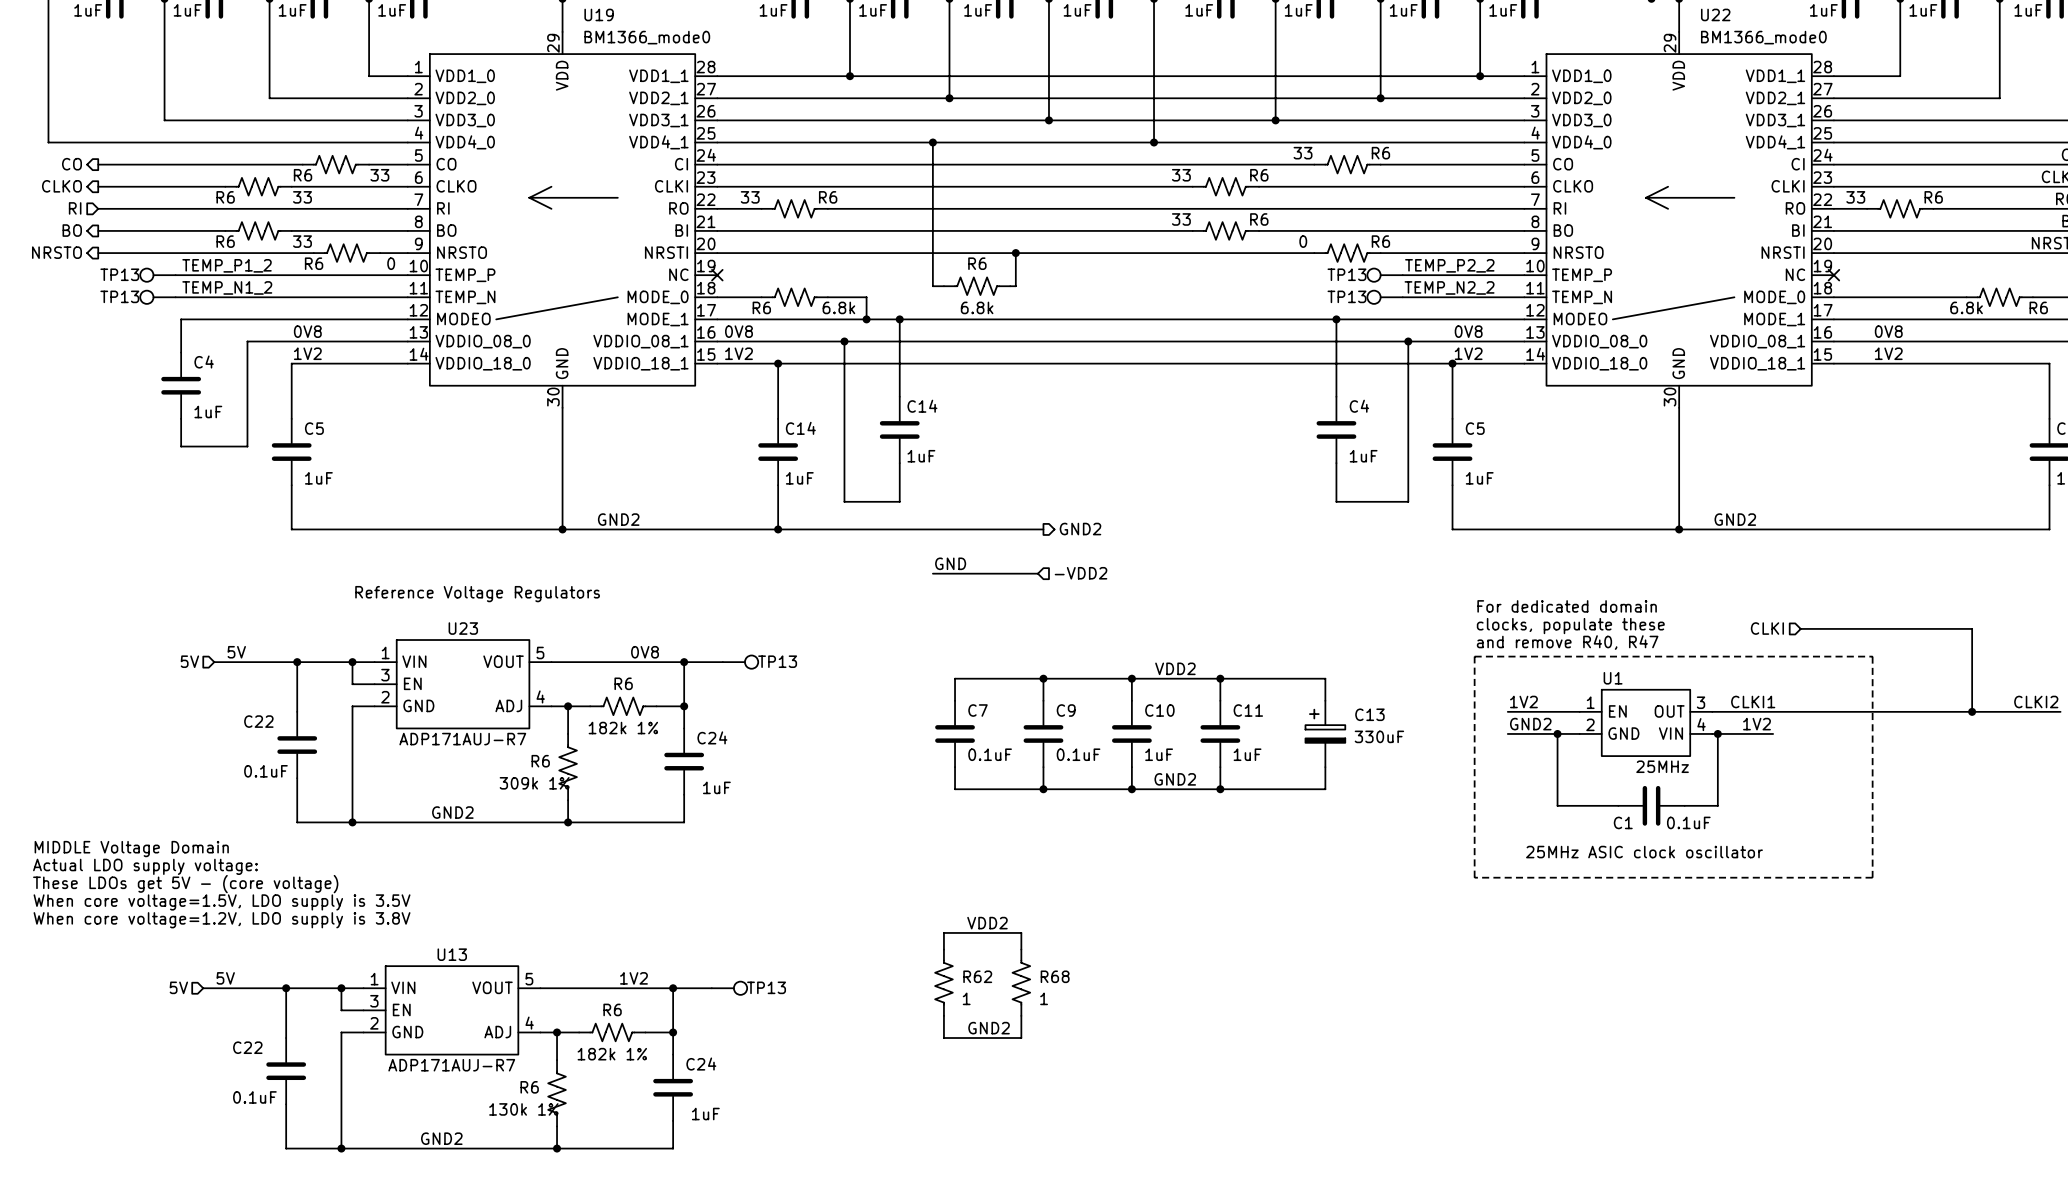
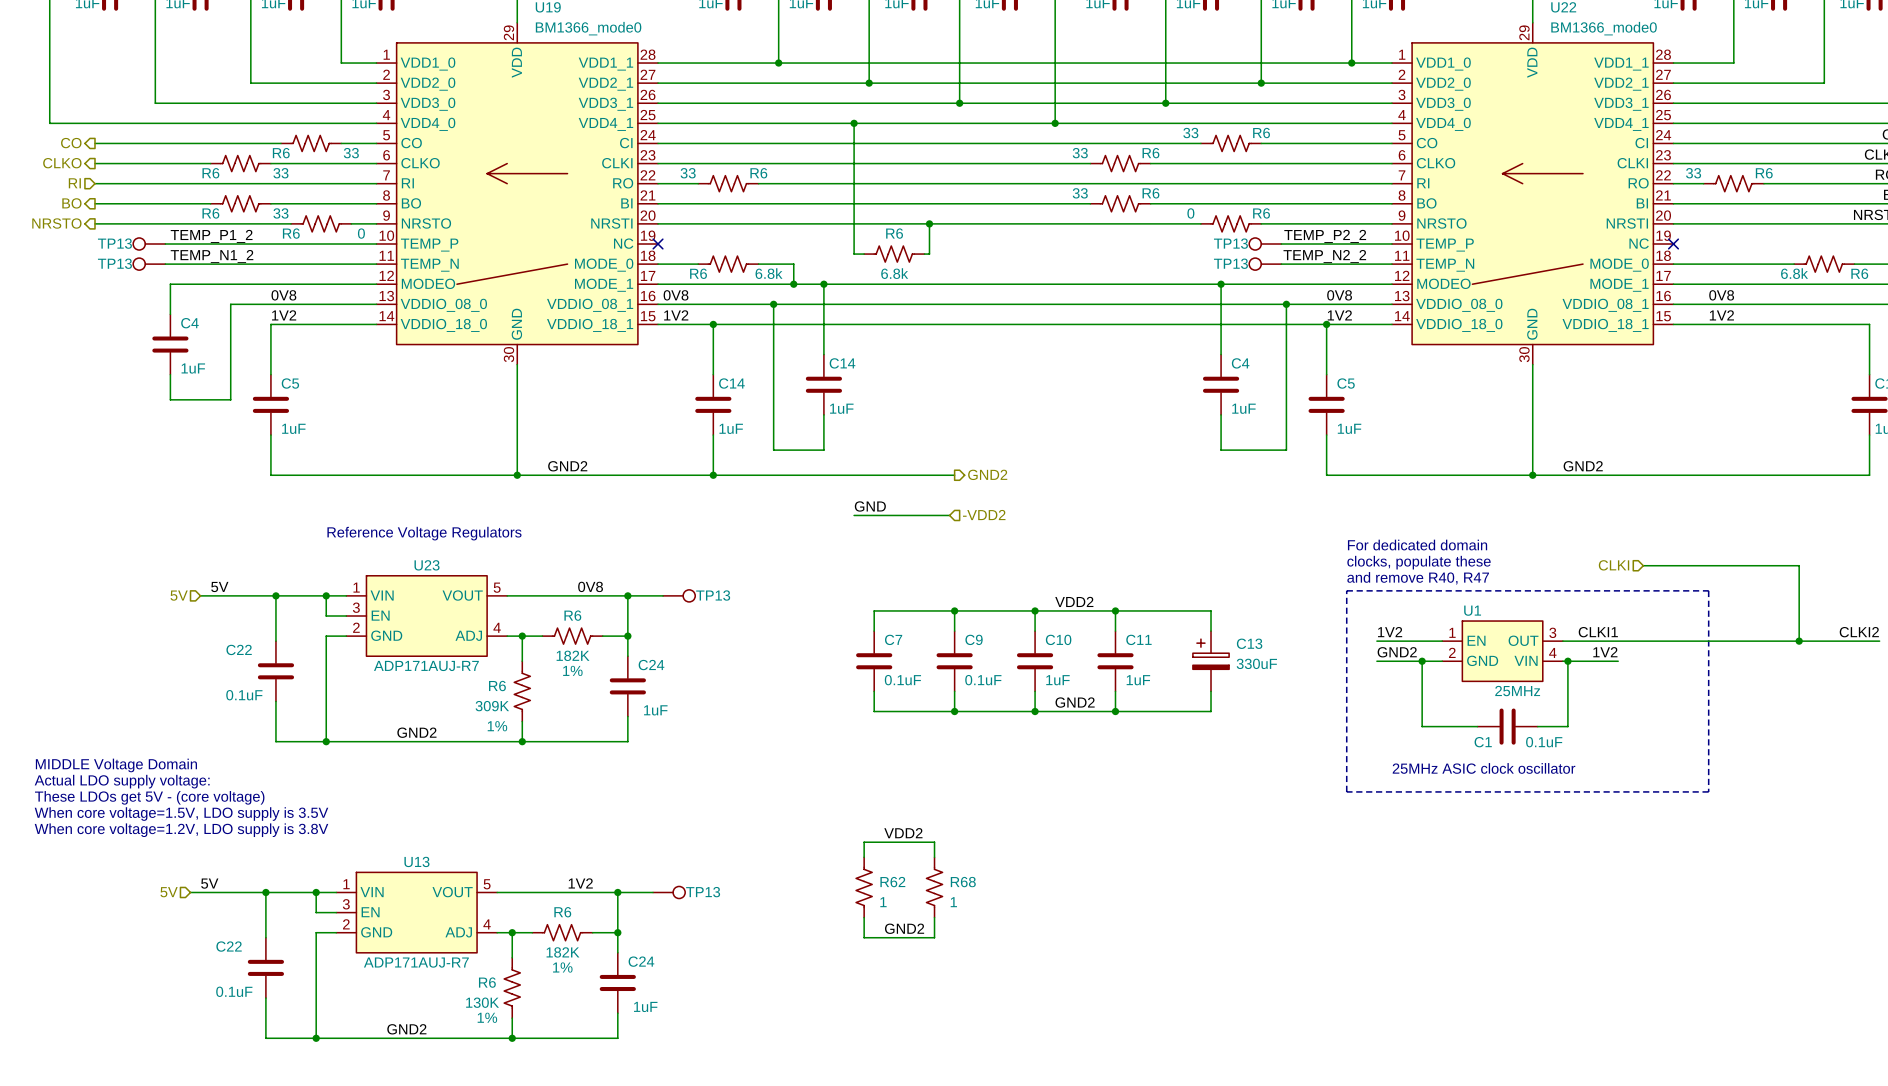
R6 value: 182k 1% (623, 728) -> 182K (573, 655)
R6 text: none -> 1% (572, 670)
R6 value: 309k 1% (534, 783) -> 309K (492, 706)
R6 text: none -> 1% (497, 726)
R6 value: 182k 1% (612, 1054) -> 182K (562, 952)
R6 text: none -> 1% (562, 967)
R6 value: 130k 1% (523, 1109) -> 130K (482, 1002)
R6 text: none -> 1% (487, 1017)

